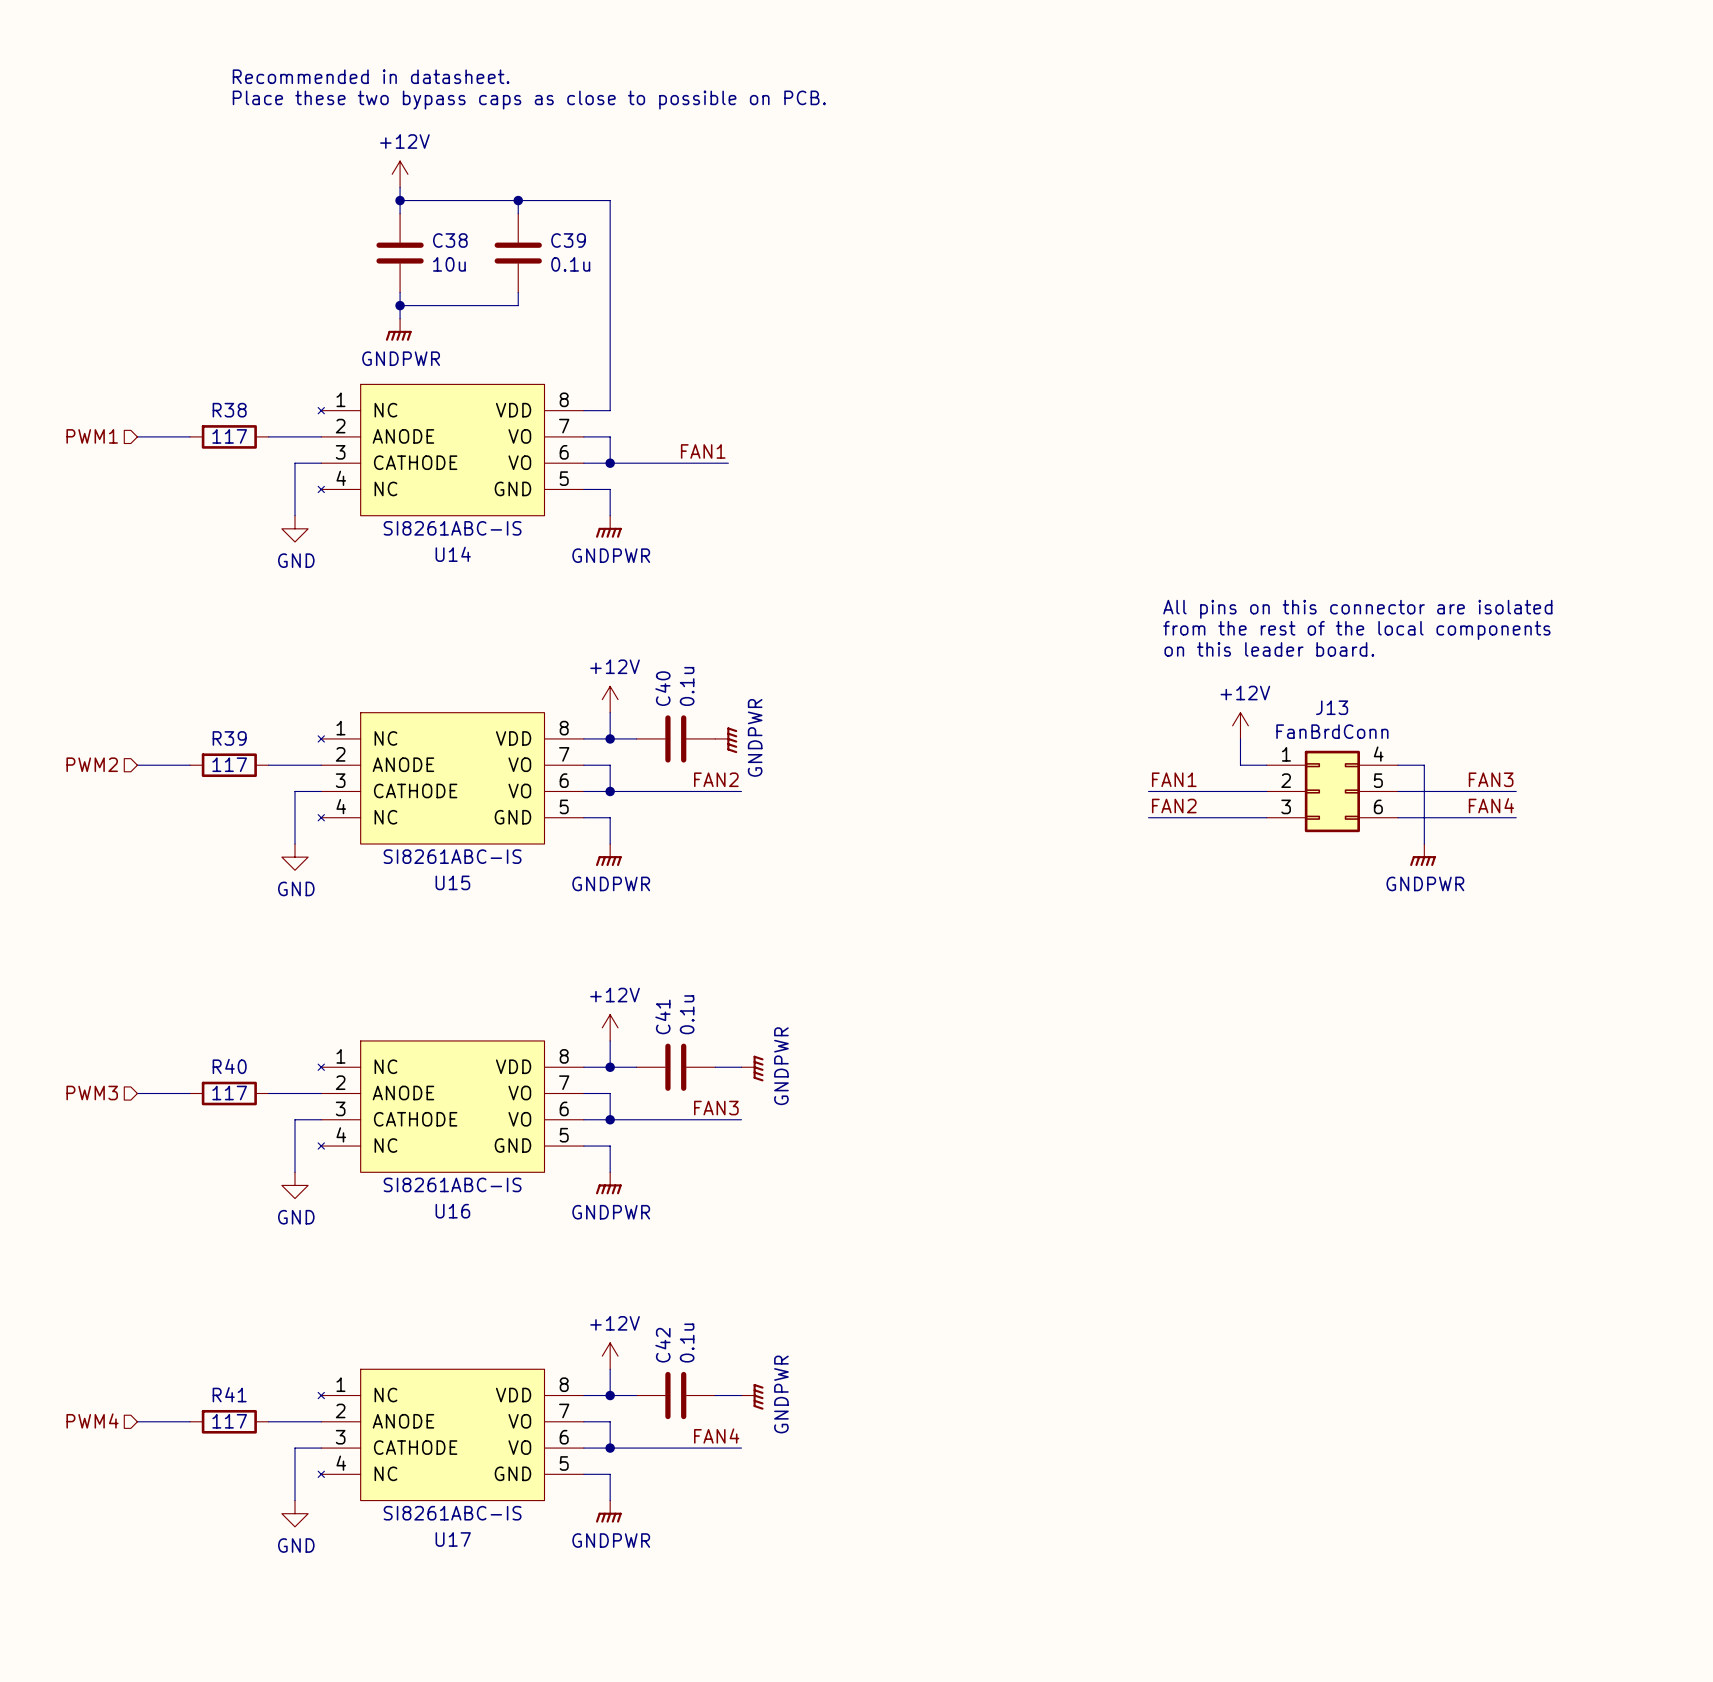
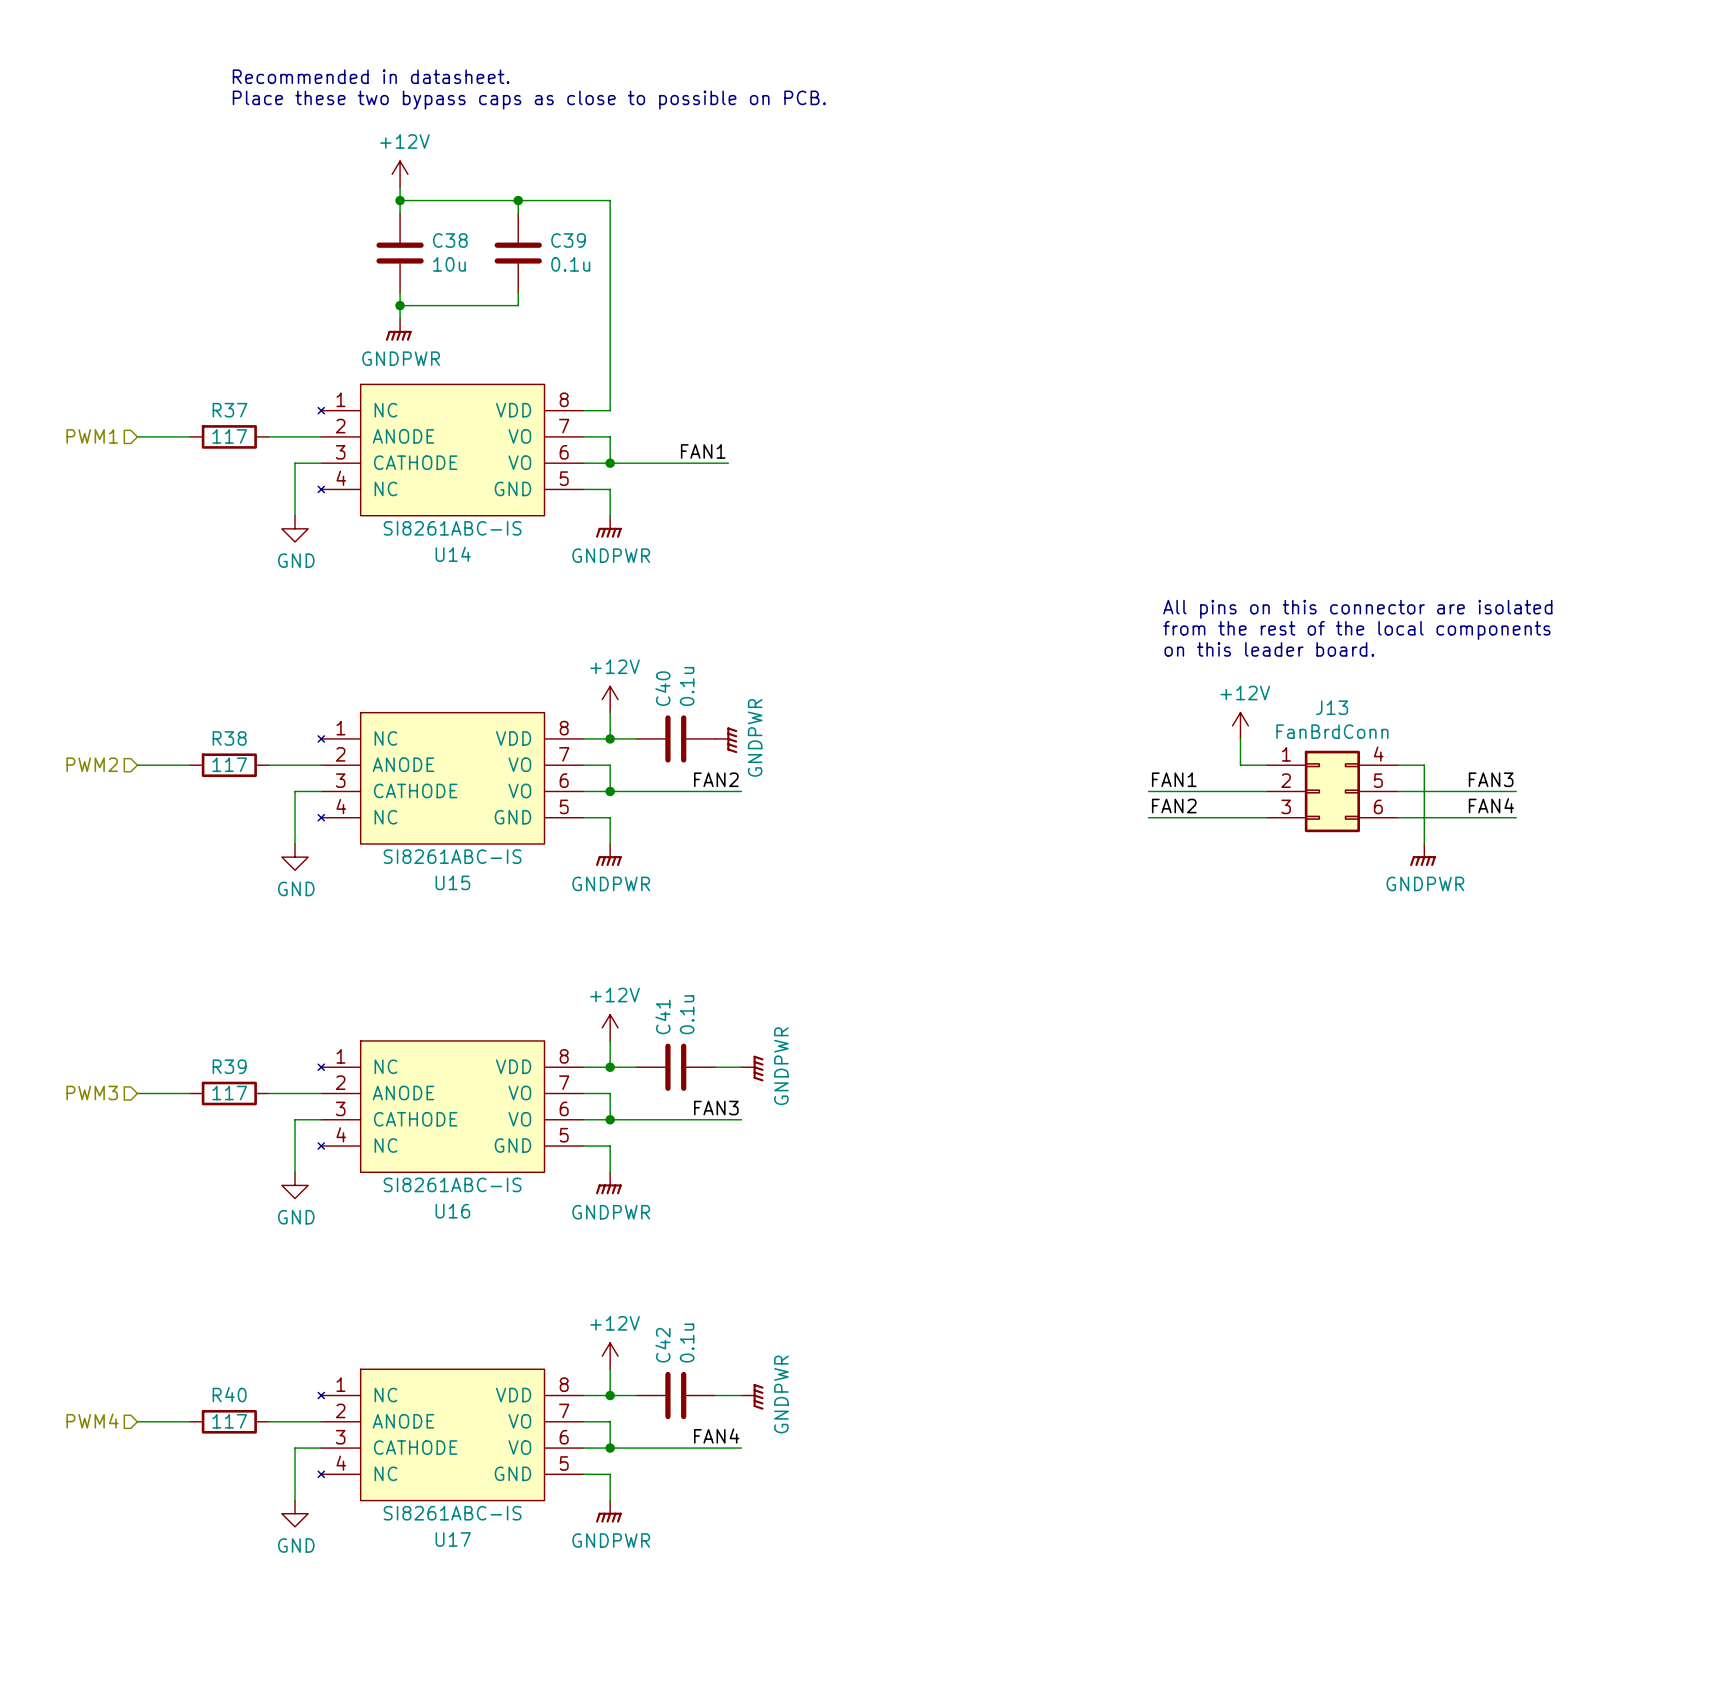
R38 name: R38 (229, 410) -> R37 (229, 410)
R39 name: R39 (229, 738) -> R38 (229, 738)
R40 name: R40 (229, 1066) -> R39 (229, 1066)
R41 name: R41 (229, 1394) -> R40 (229, 1394)

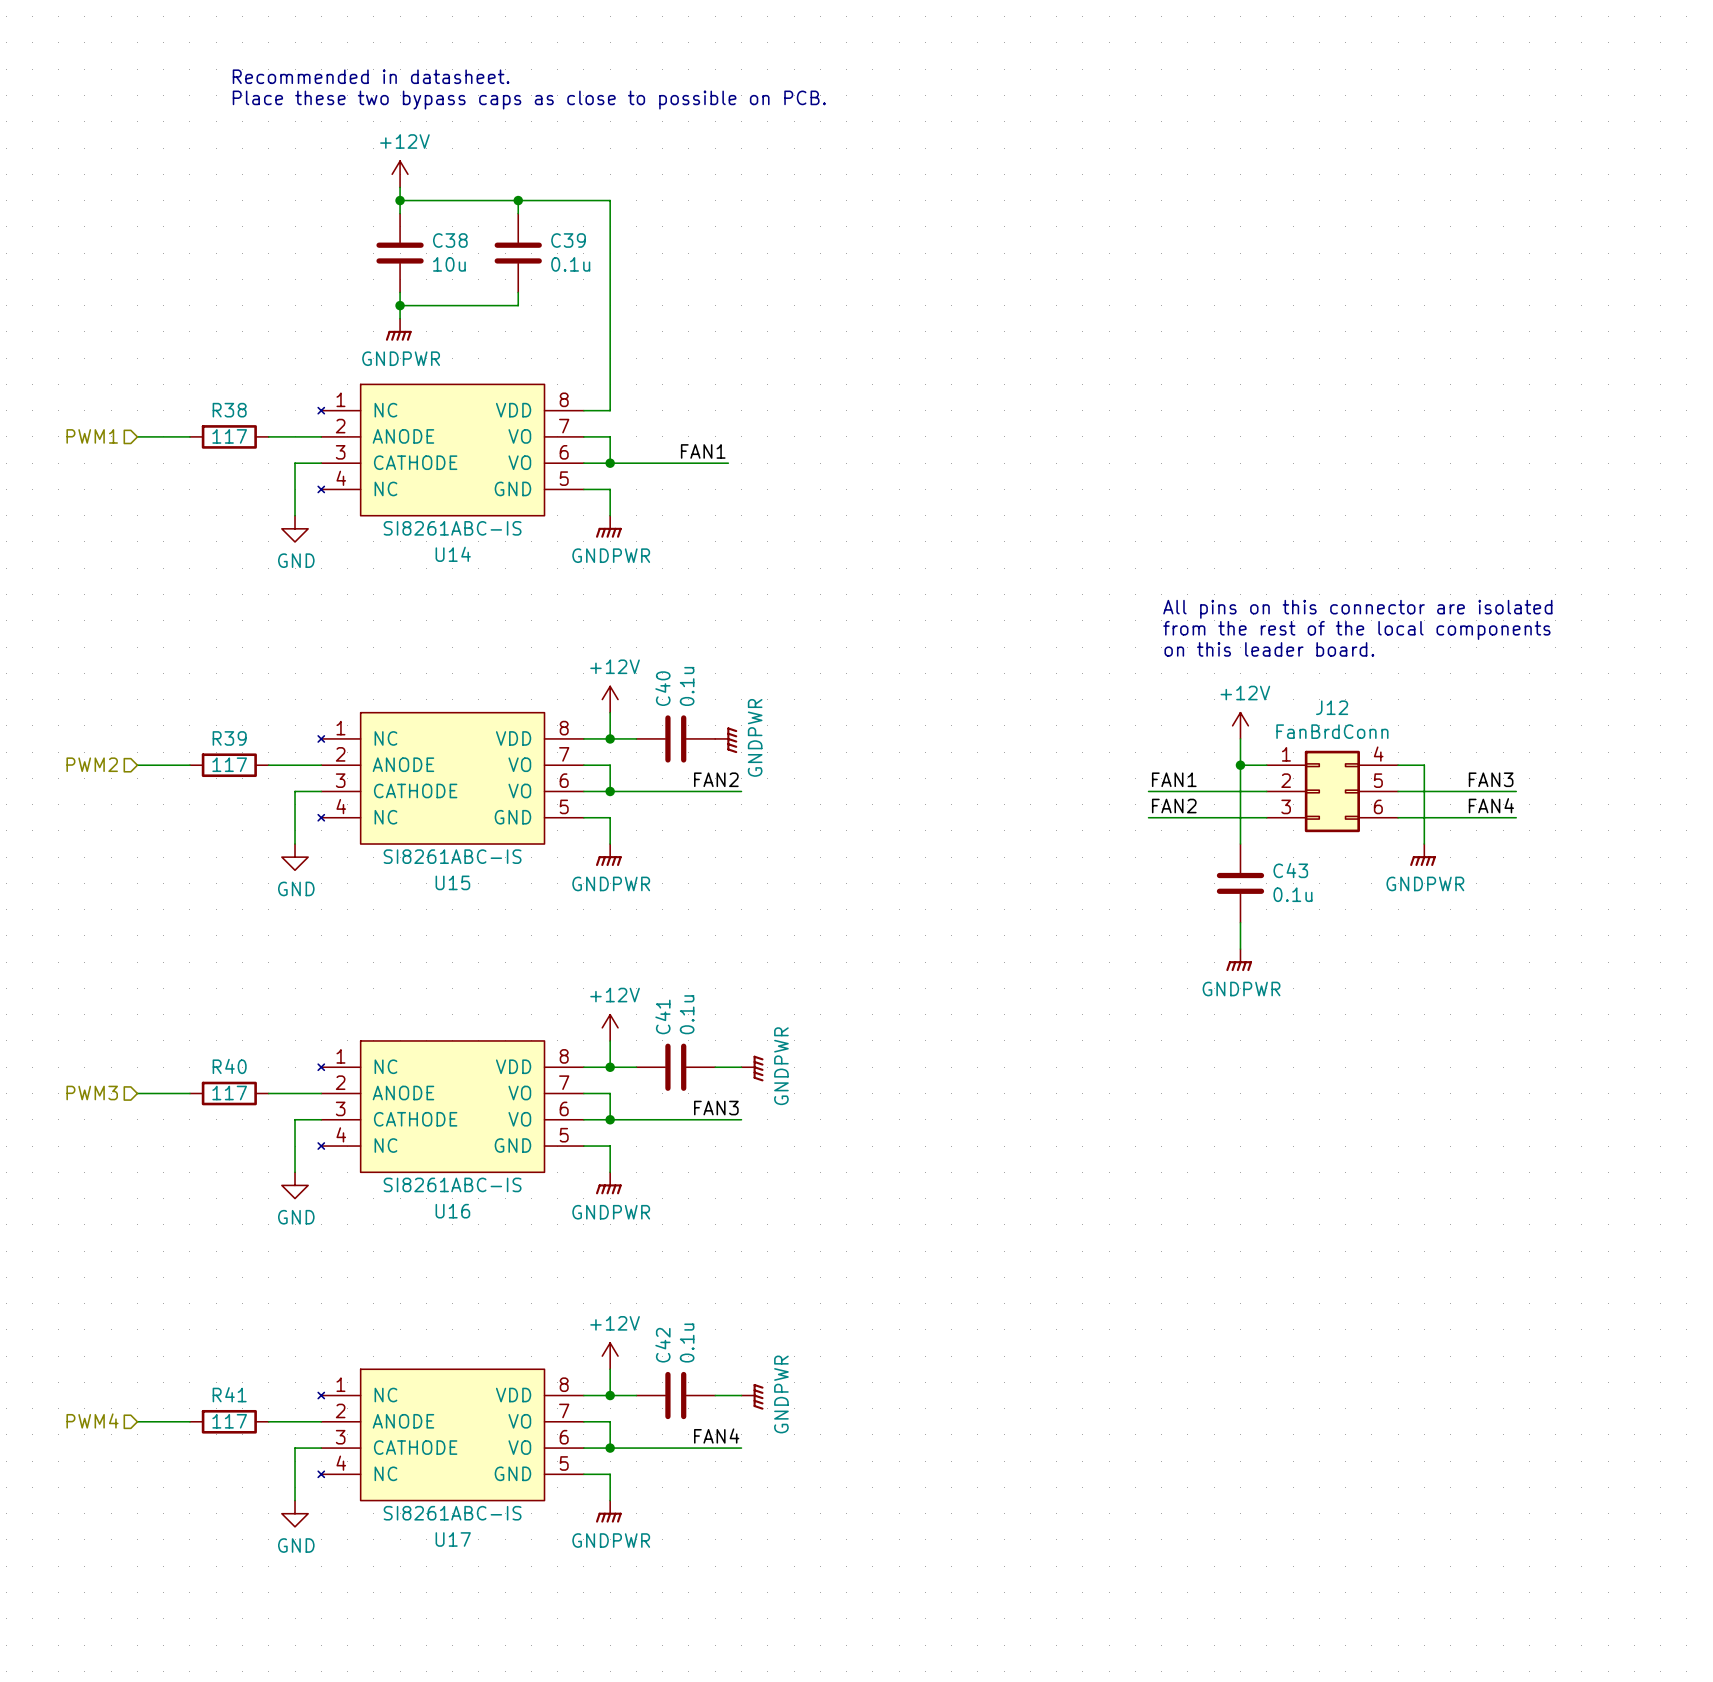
R37 name: R37 (229, 410) -> R38 (229, 410)
J13 name: J13 (1332, 707) -> J12 (1332, 707)
R38 name: R38 (229, 738) -> R39 (229, 738)
wire: none -> (1240, 765) (1240, 844)
junction: none -> (1240, 765)
C43: none -> 0.1u (1240, 883)
wire: none -> (1240, 922) (1240, 949)
power symbol: none -> GNDPWR (1239, 960)
R39 name: R39 (229, 1066) -> R40 (229, 1066)
R40 name: R40 (229, 1394) -> R41 (229, 1394)

